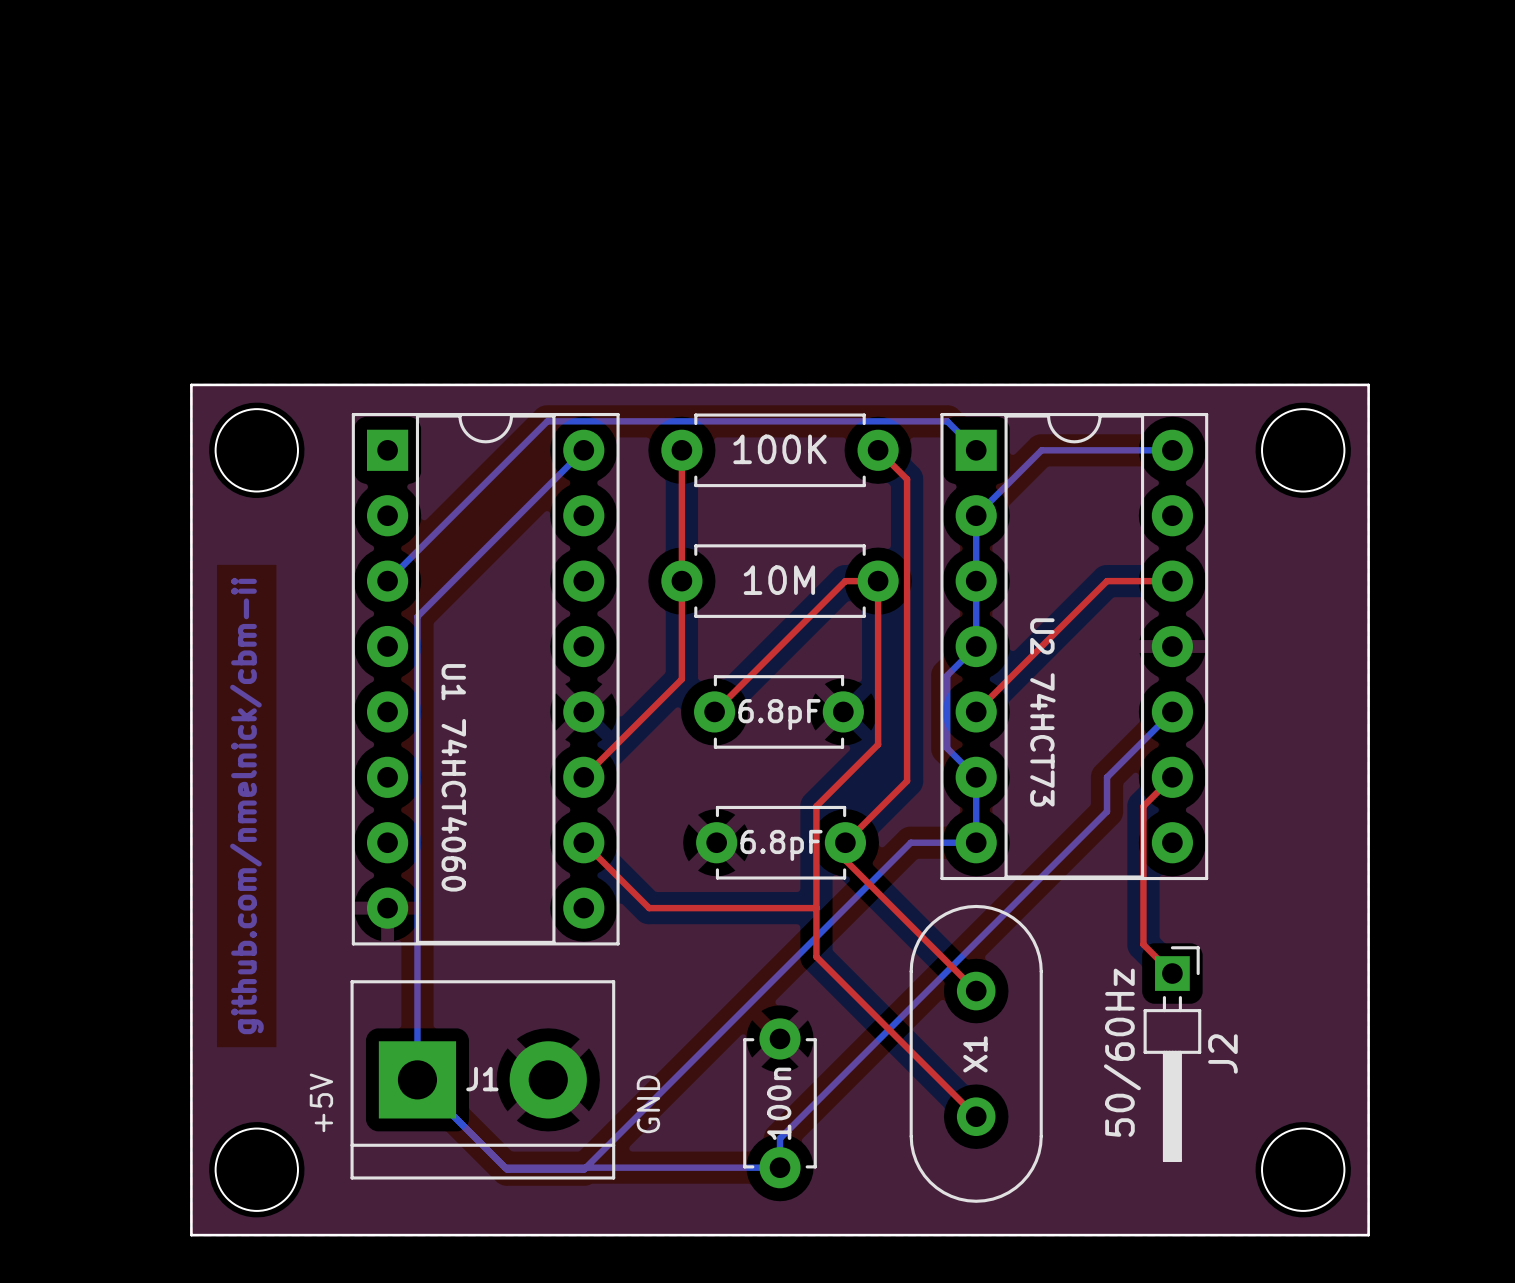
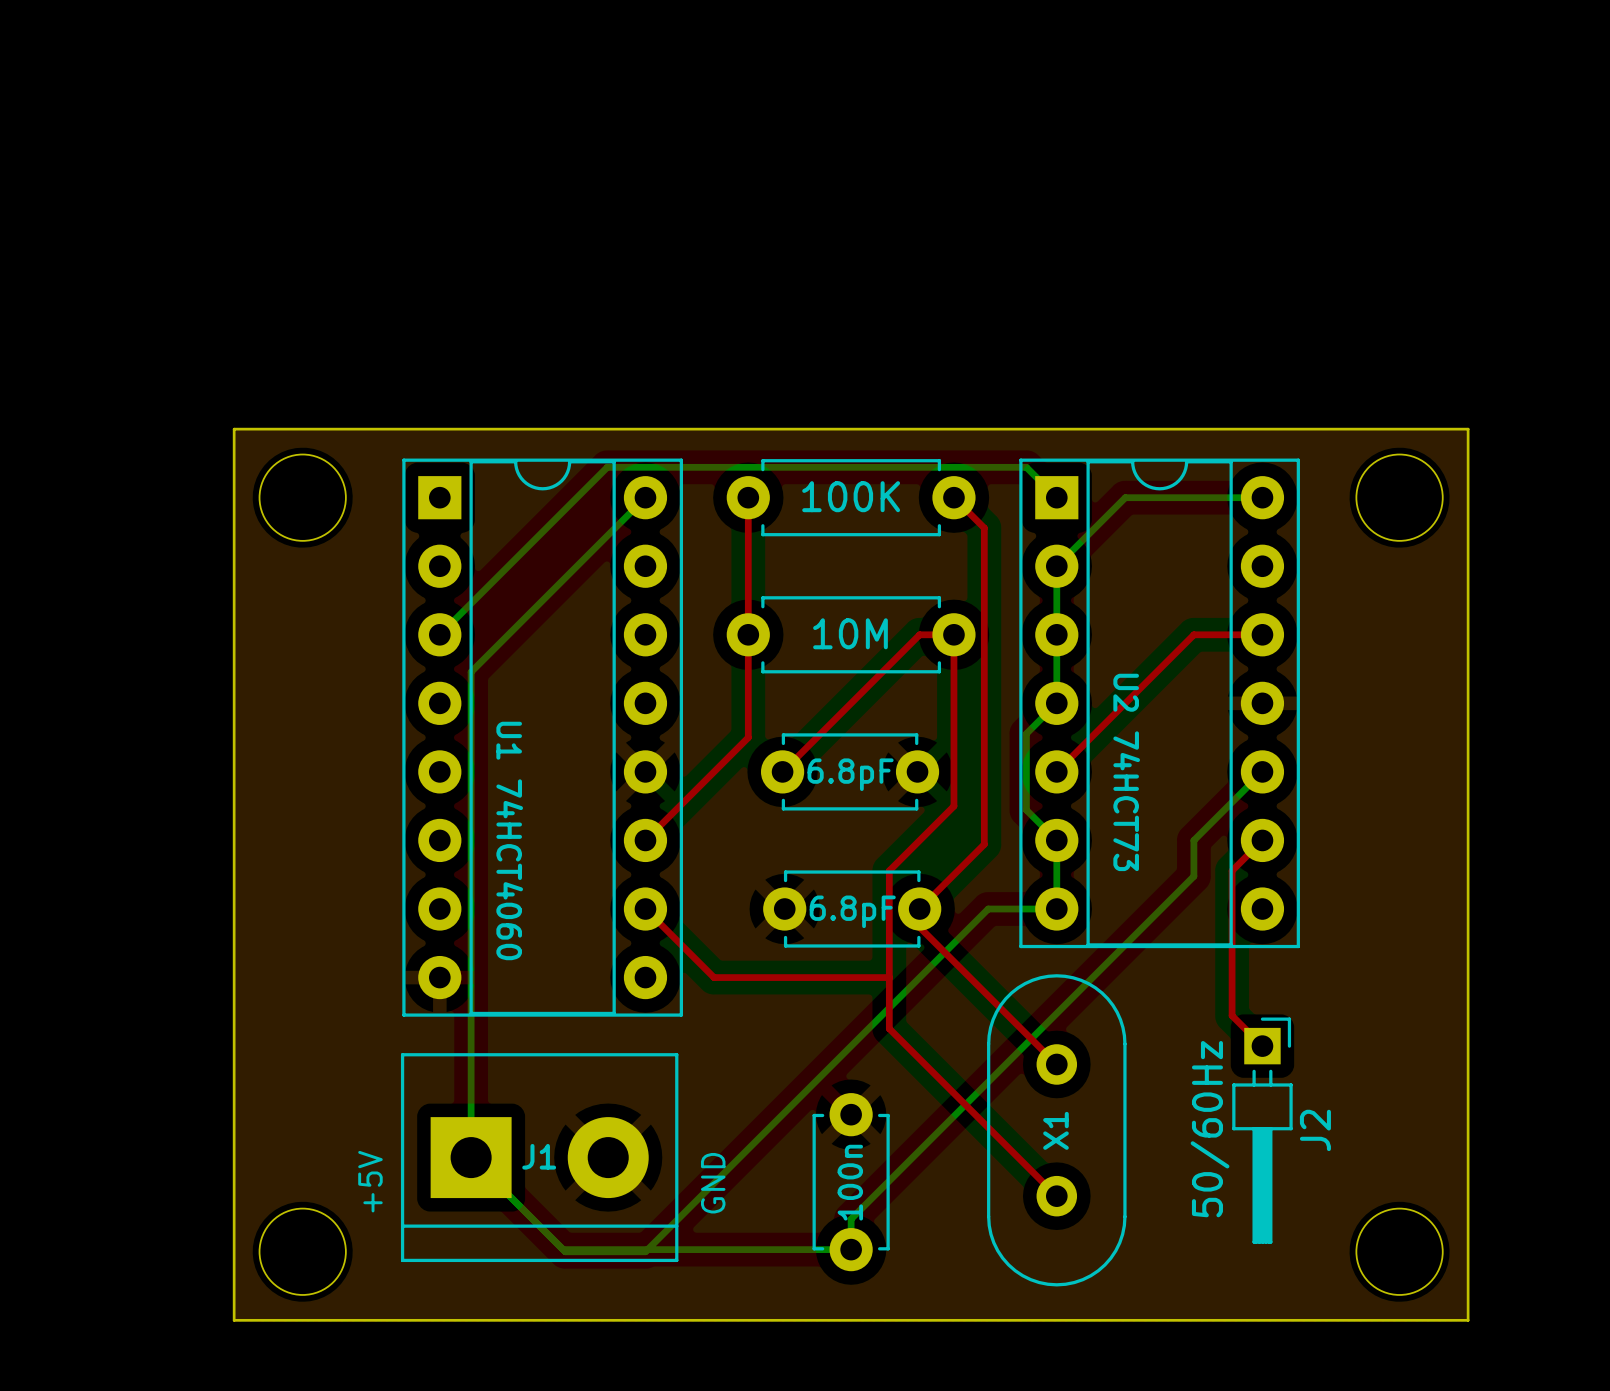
text: github.com/nmelnick/cbm-ii (246, 806) -> none

